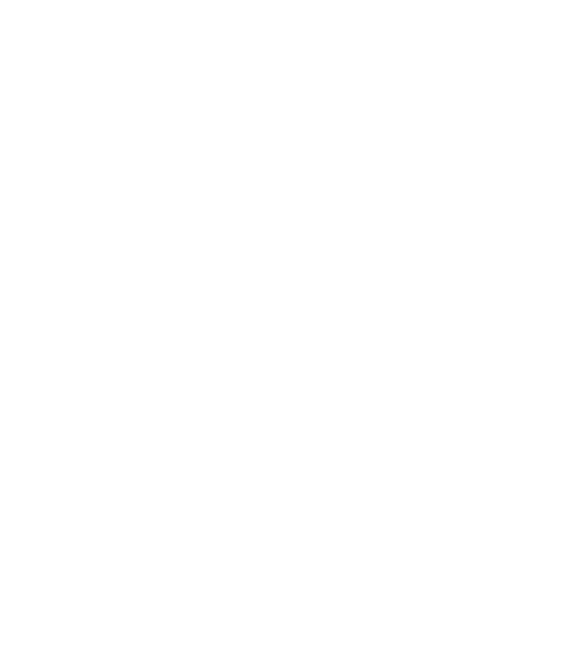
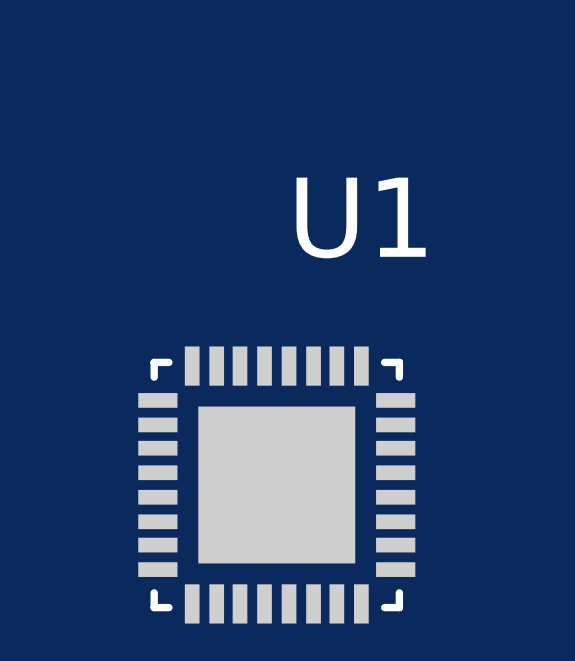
U1: none -> (276, 485)

